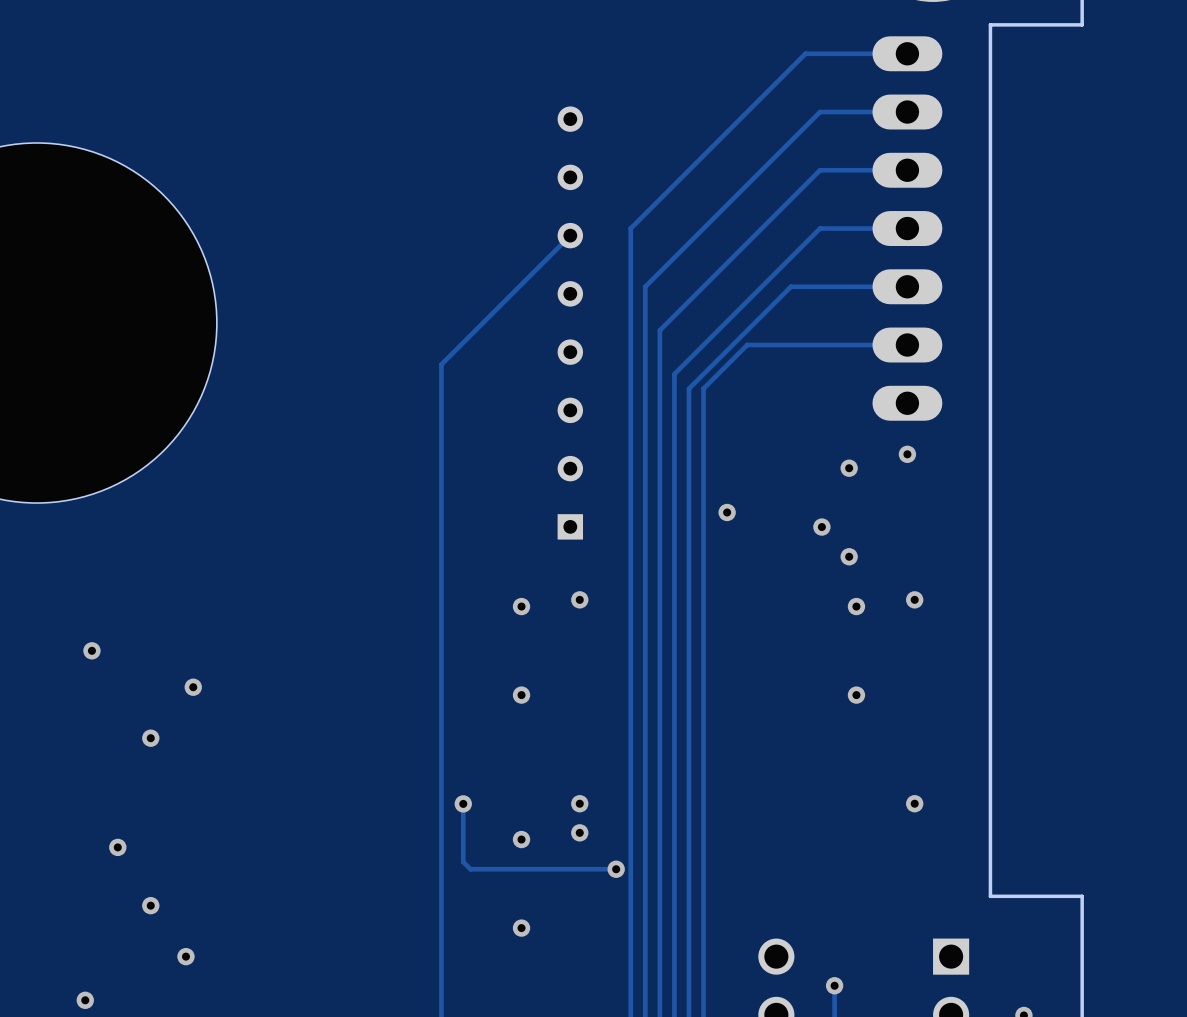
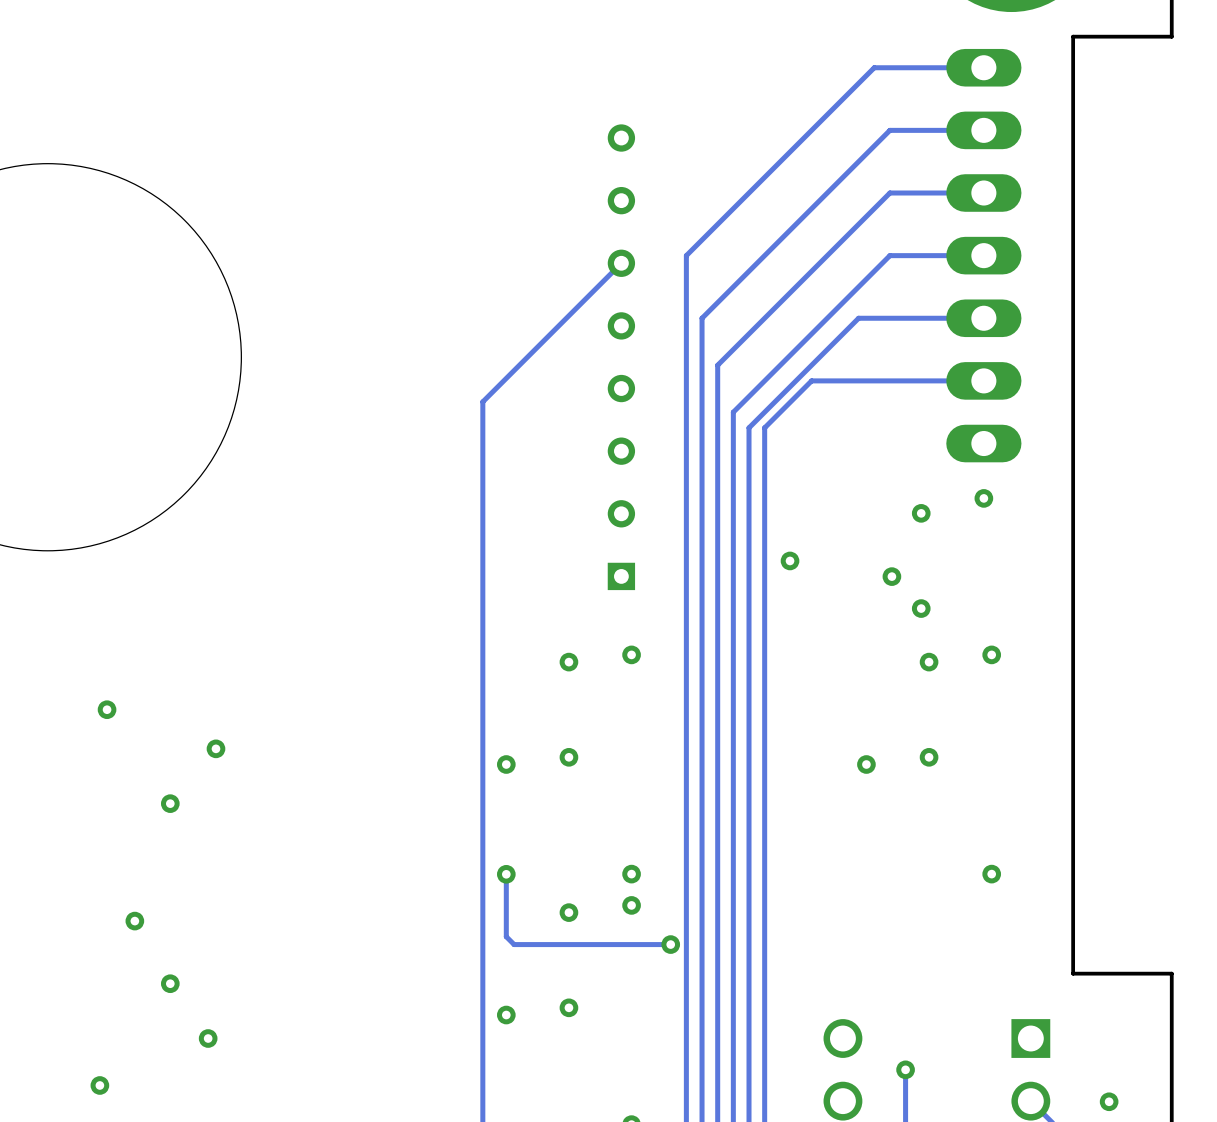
via: none -> (506, 764)
via: none -> (866, 764)
via: none -> (506, 1015)

